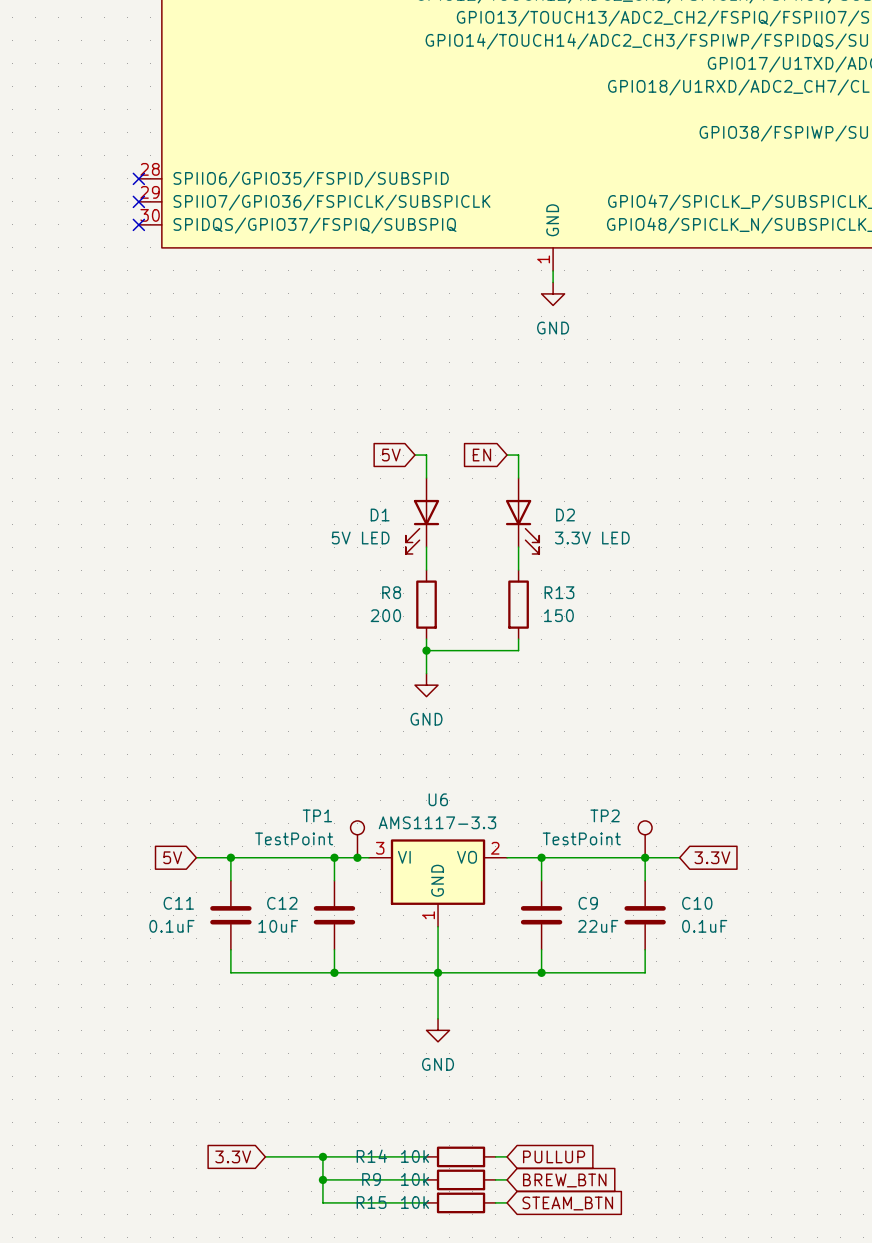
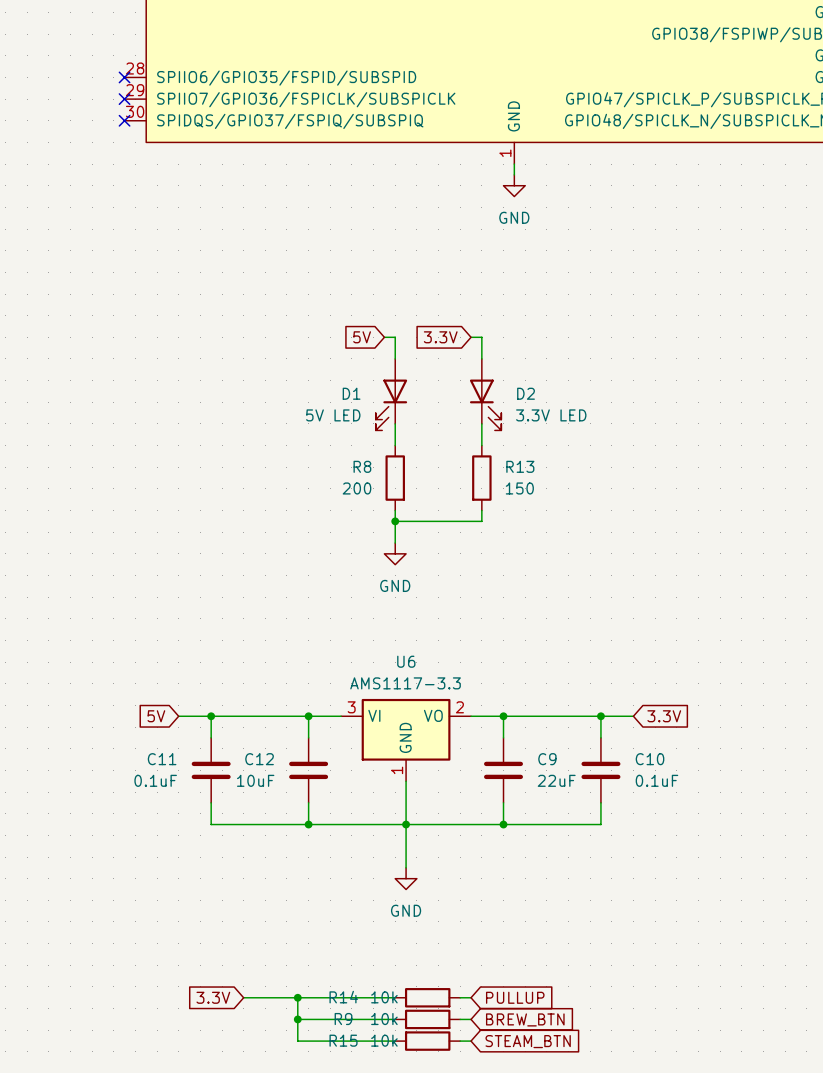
global label: EN (481, 455) -> 3.3V (440, 337)
TP1: TestPoint (357, 839) -> none
TP2: TestPoint (645, 839) -> none
junction: (357, 857) -> none

